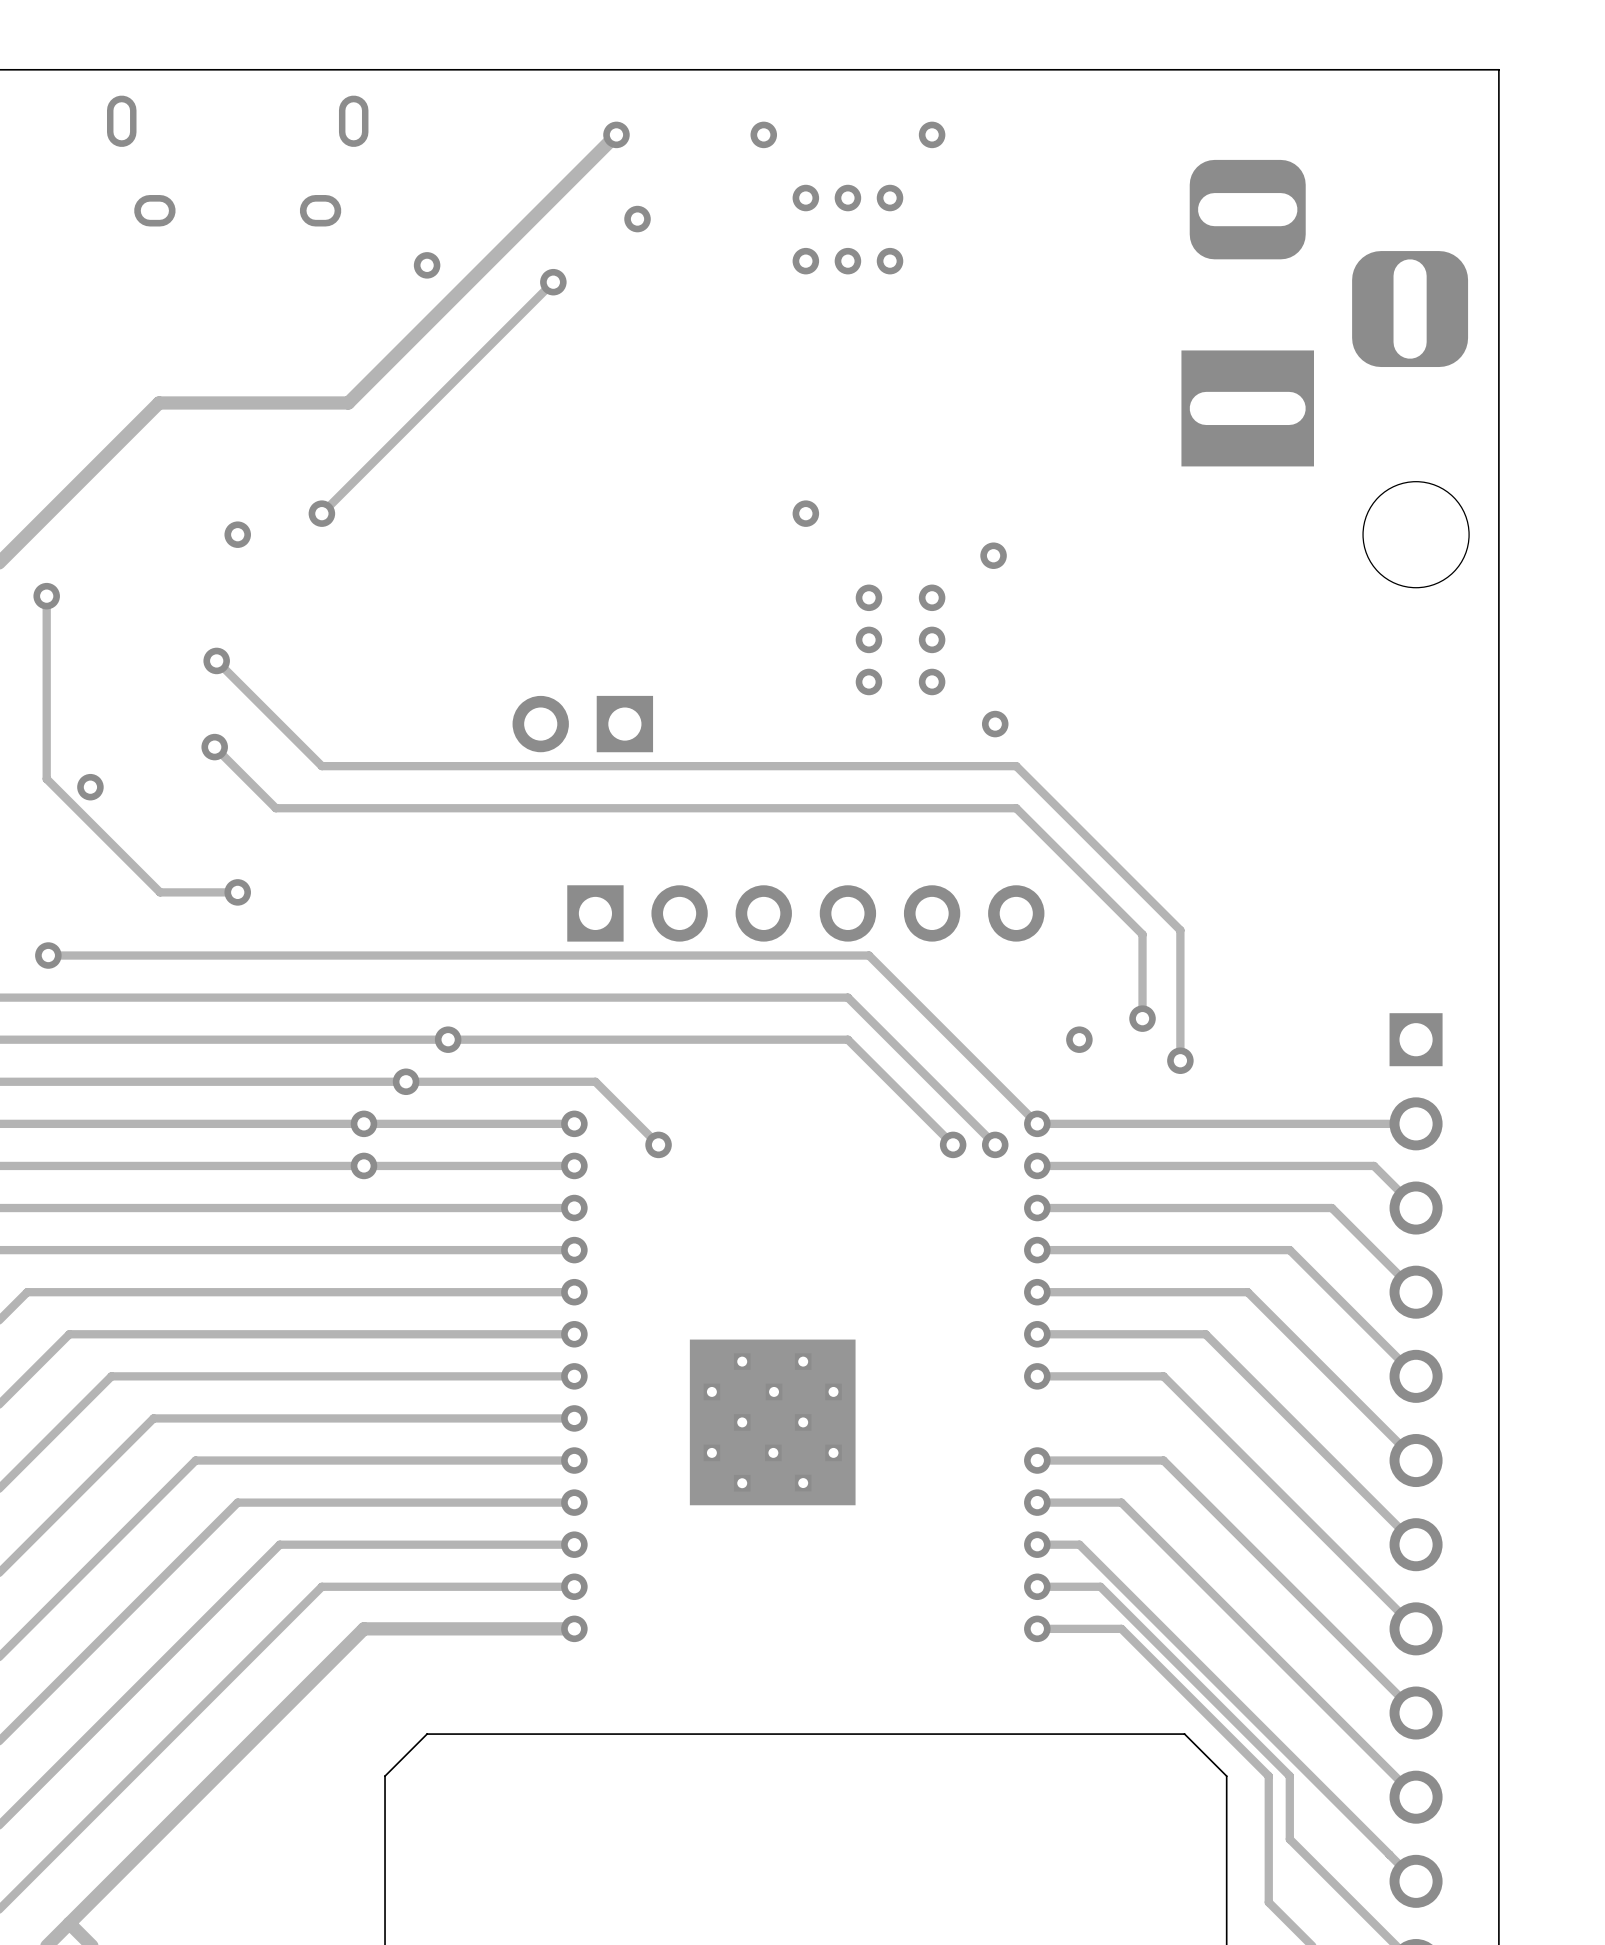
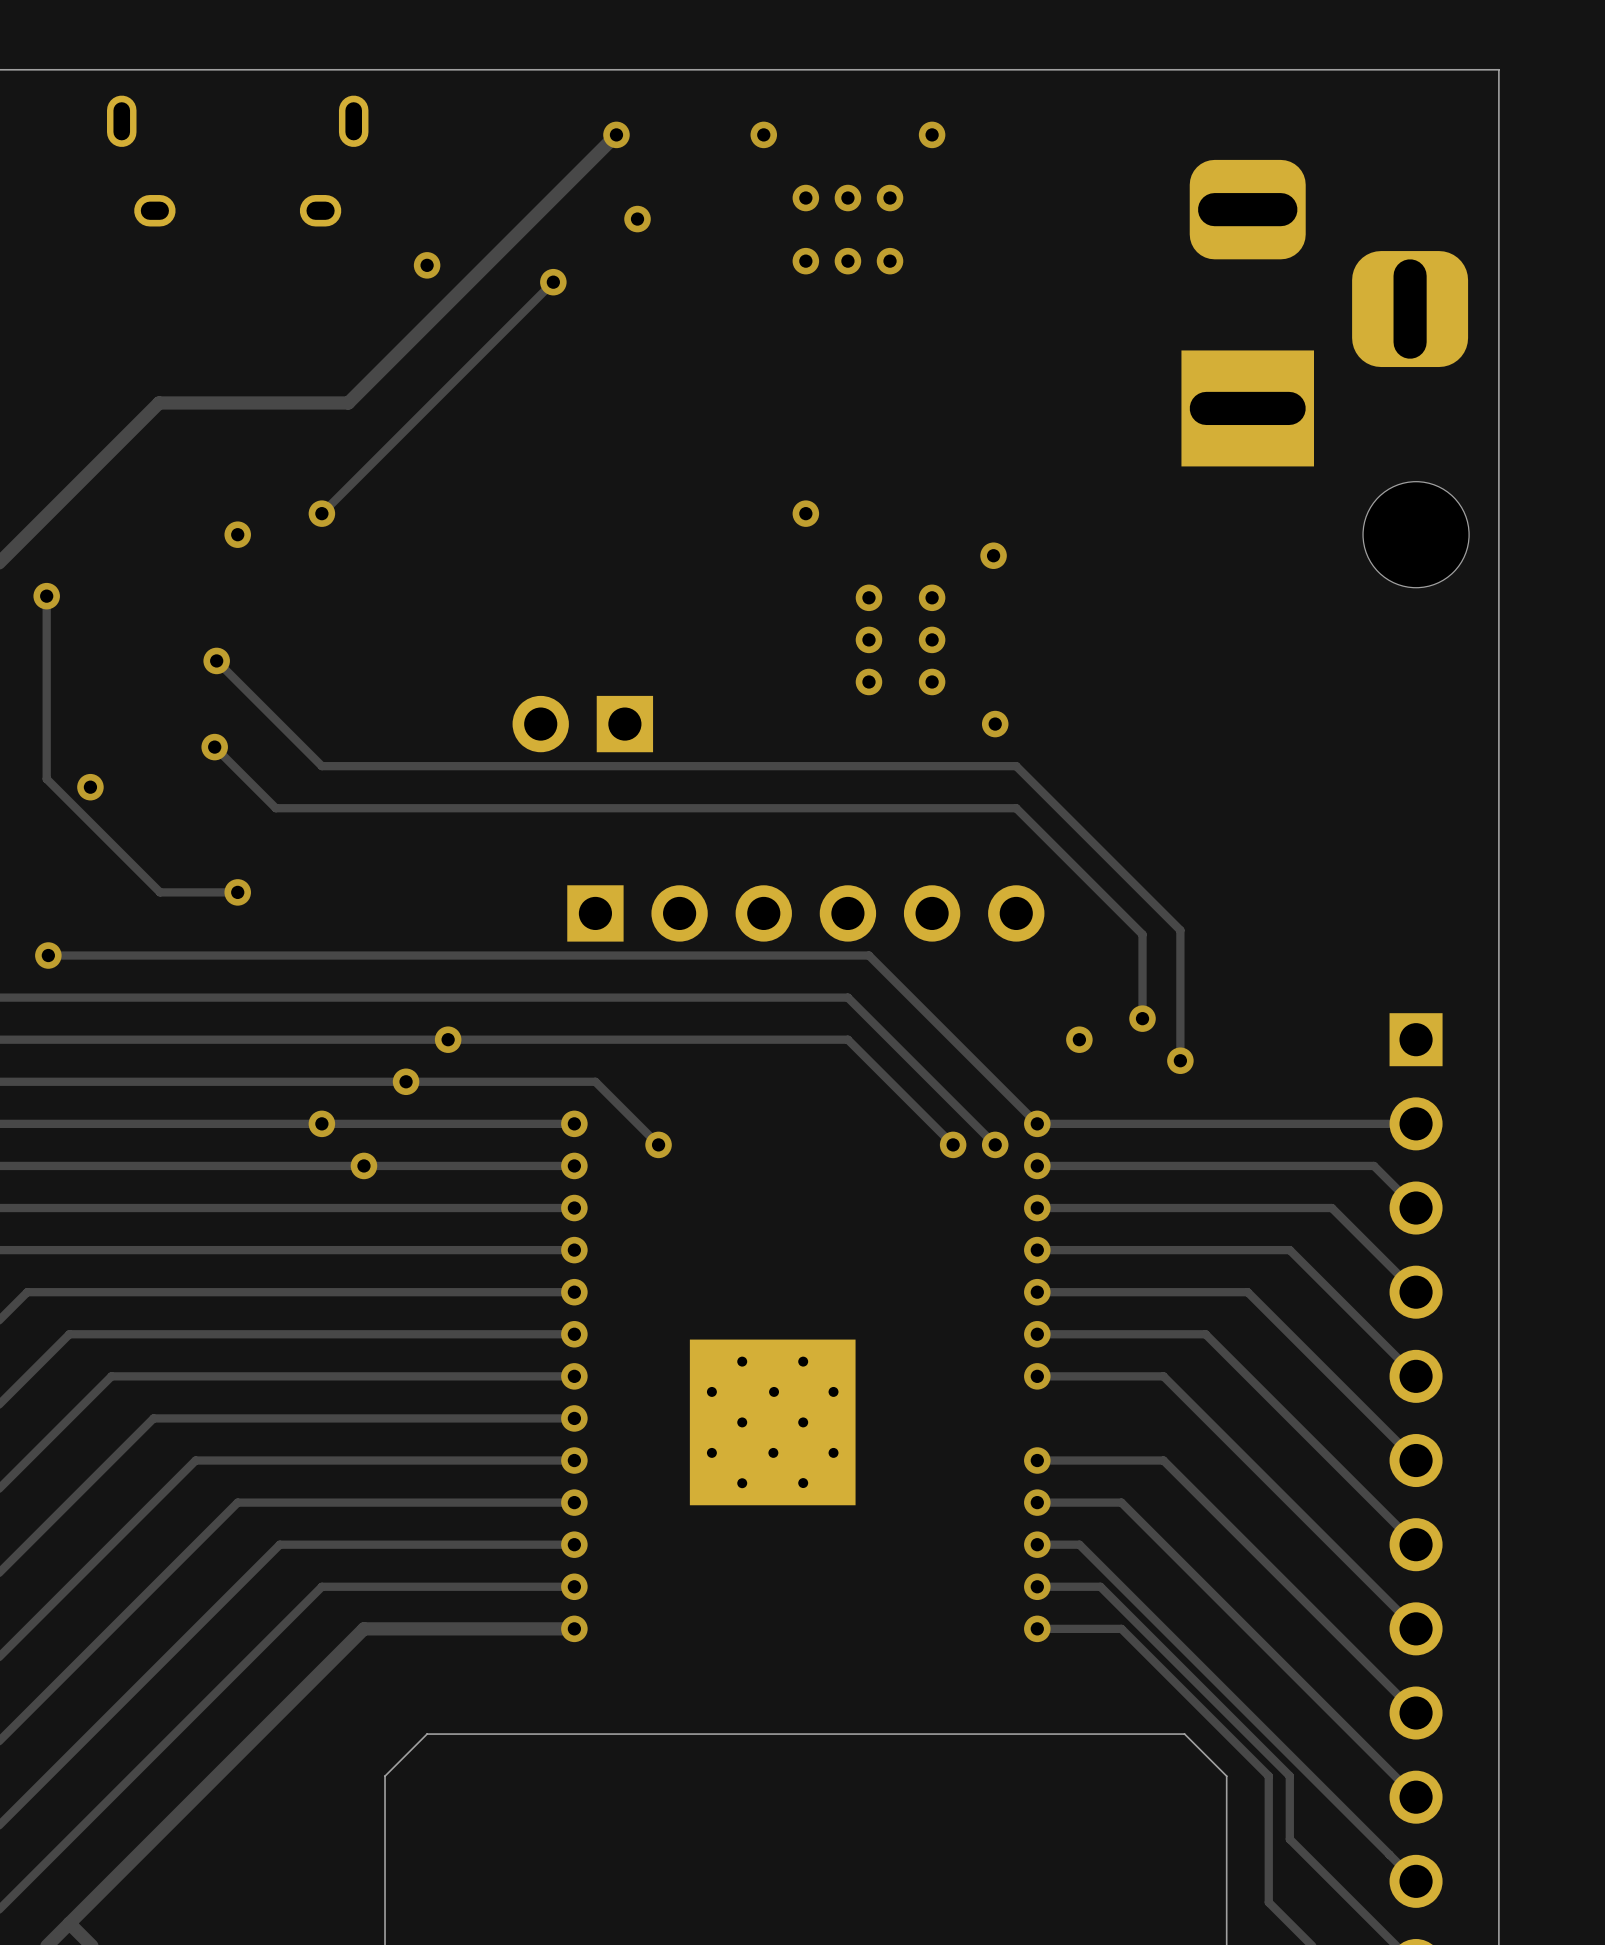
via position: (363, 1123) -> (321, 1123)

